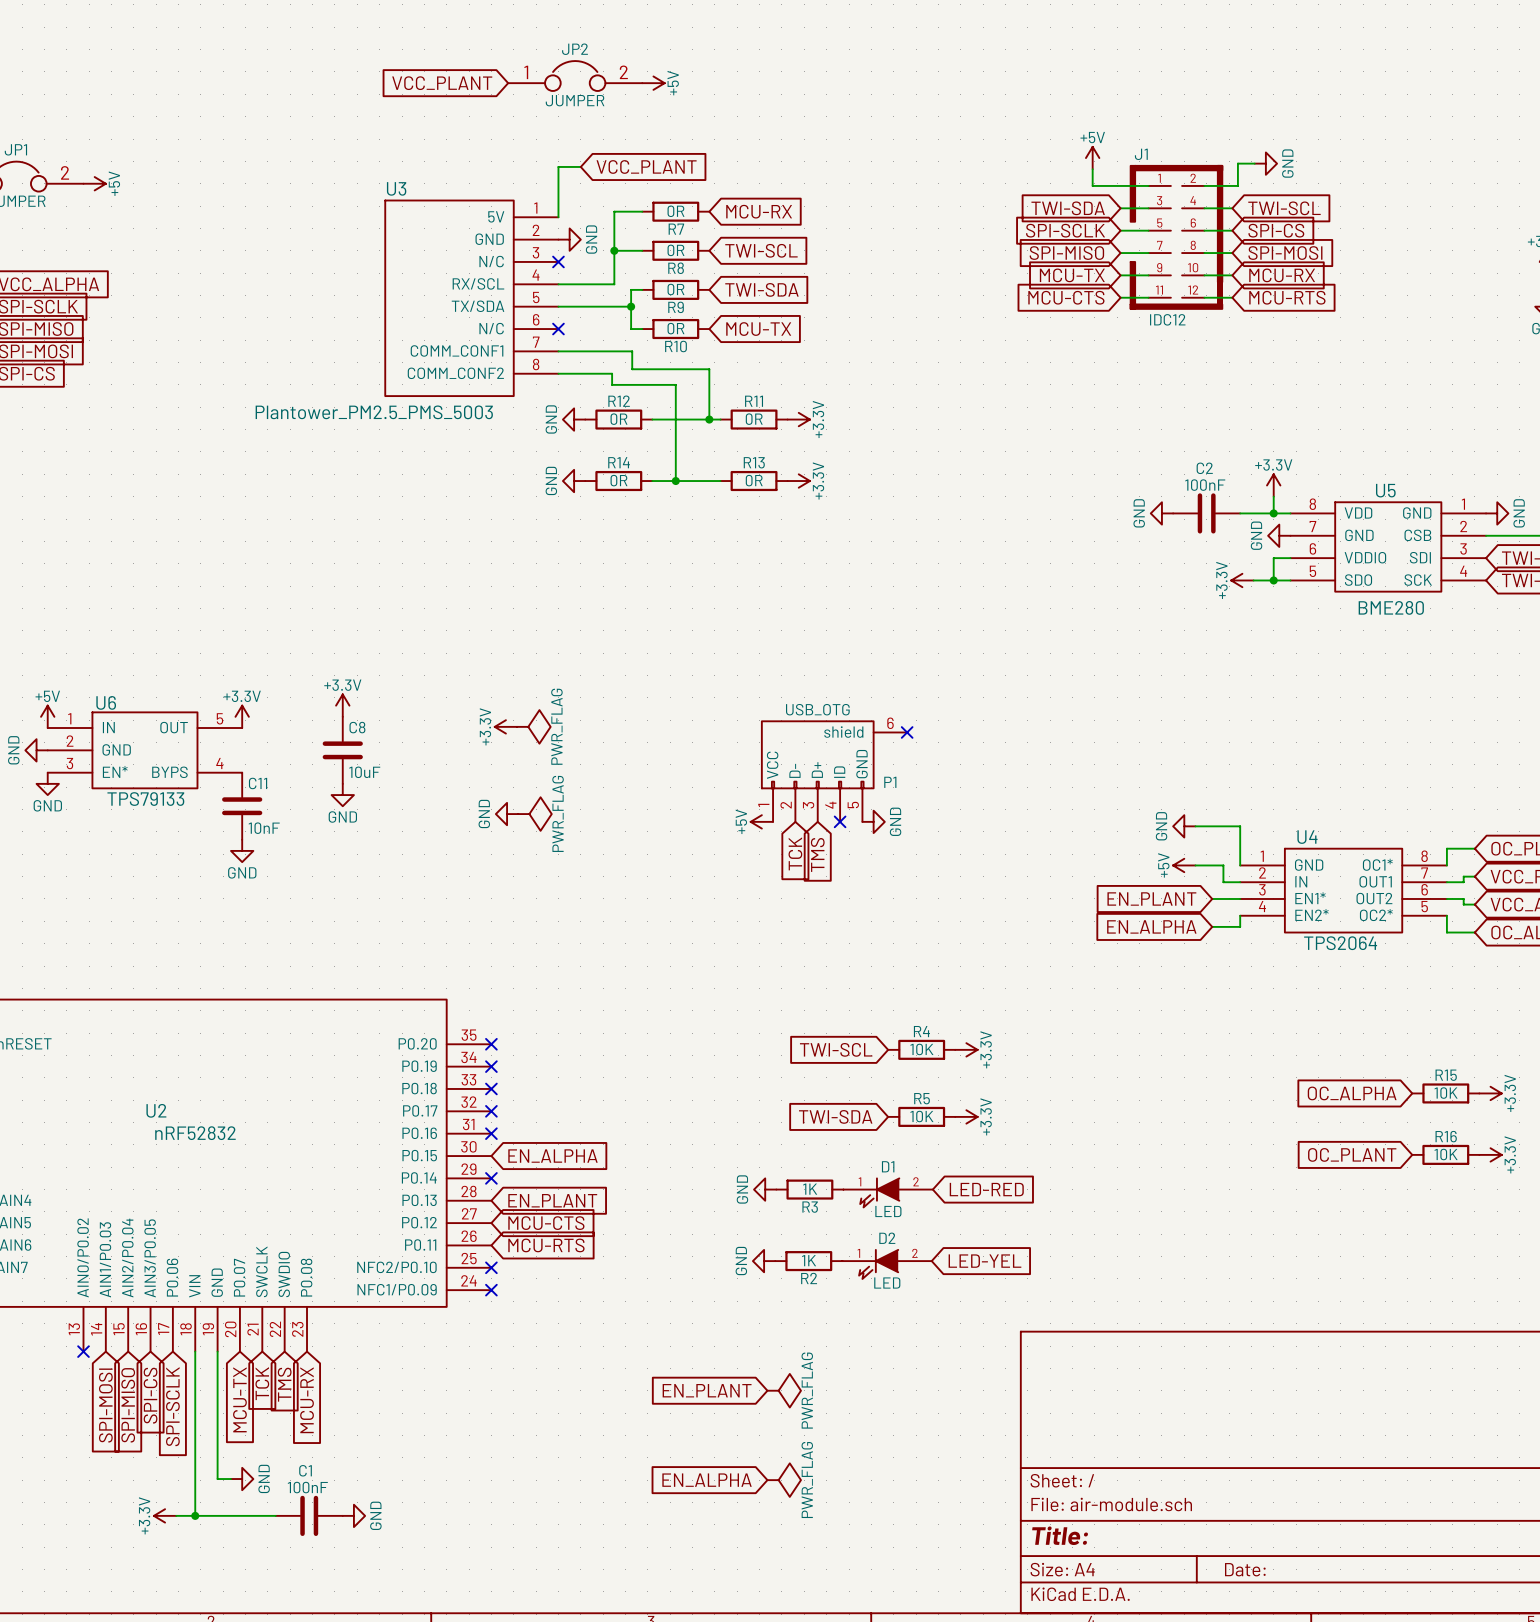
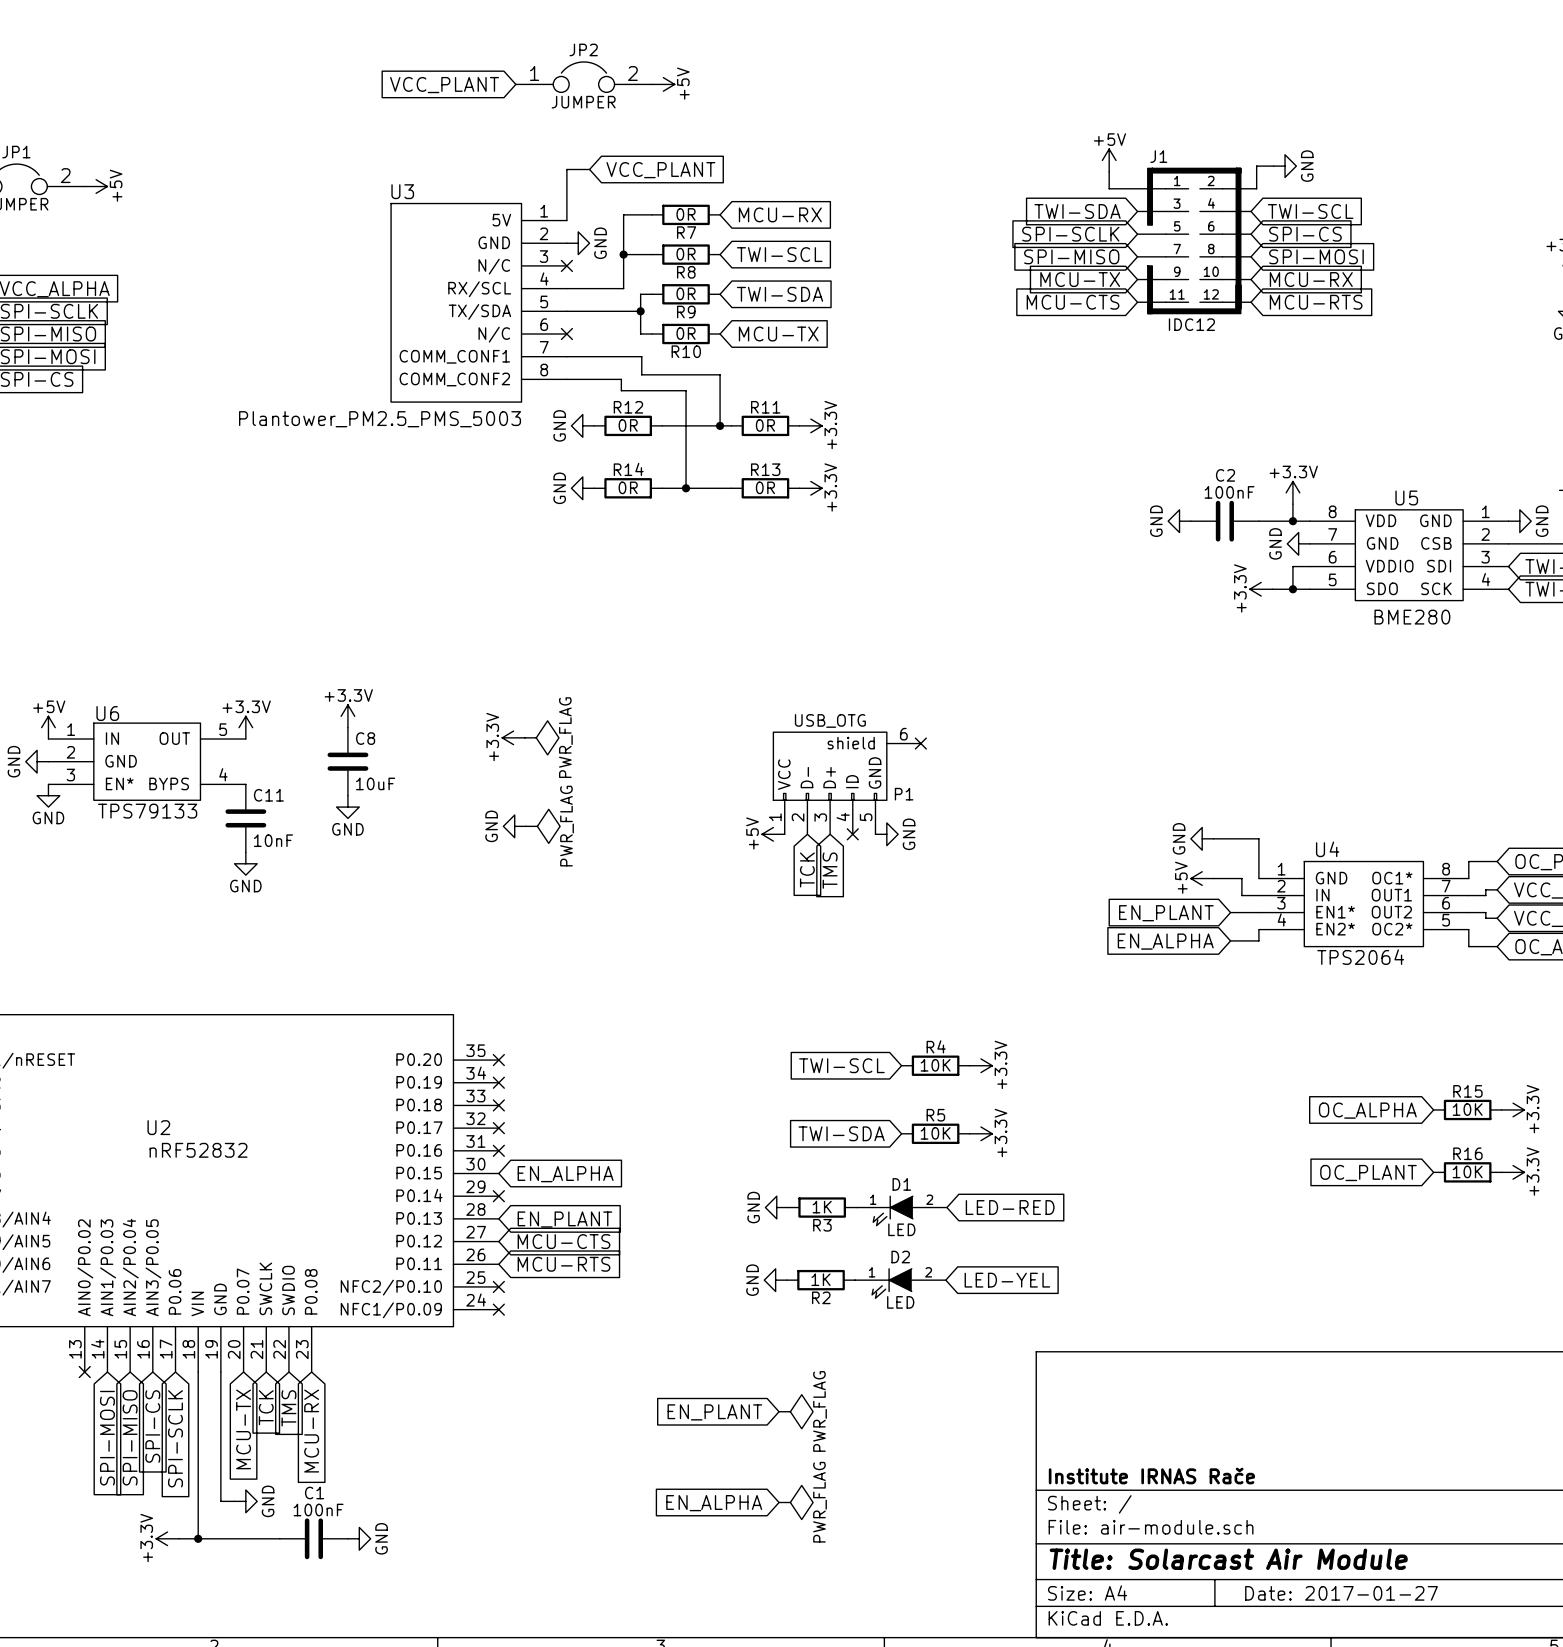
title block: none -> Institute IRNAS Rače (1151, 1476)
title block: Title: (1060, 1535) -> Title: Solarcast Air Module (1228, 1559)
title block: Date: (1245, 1569) -> Date: 2017-01-27 (1341, 1593)

